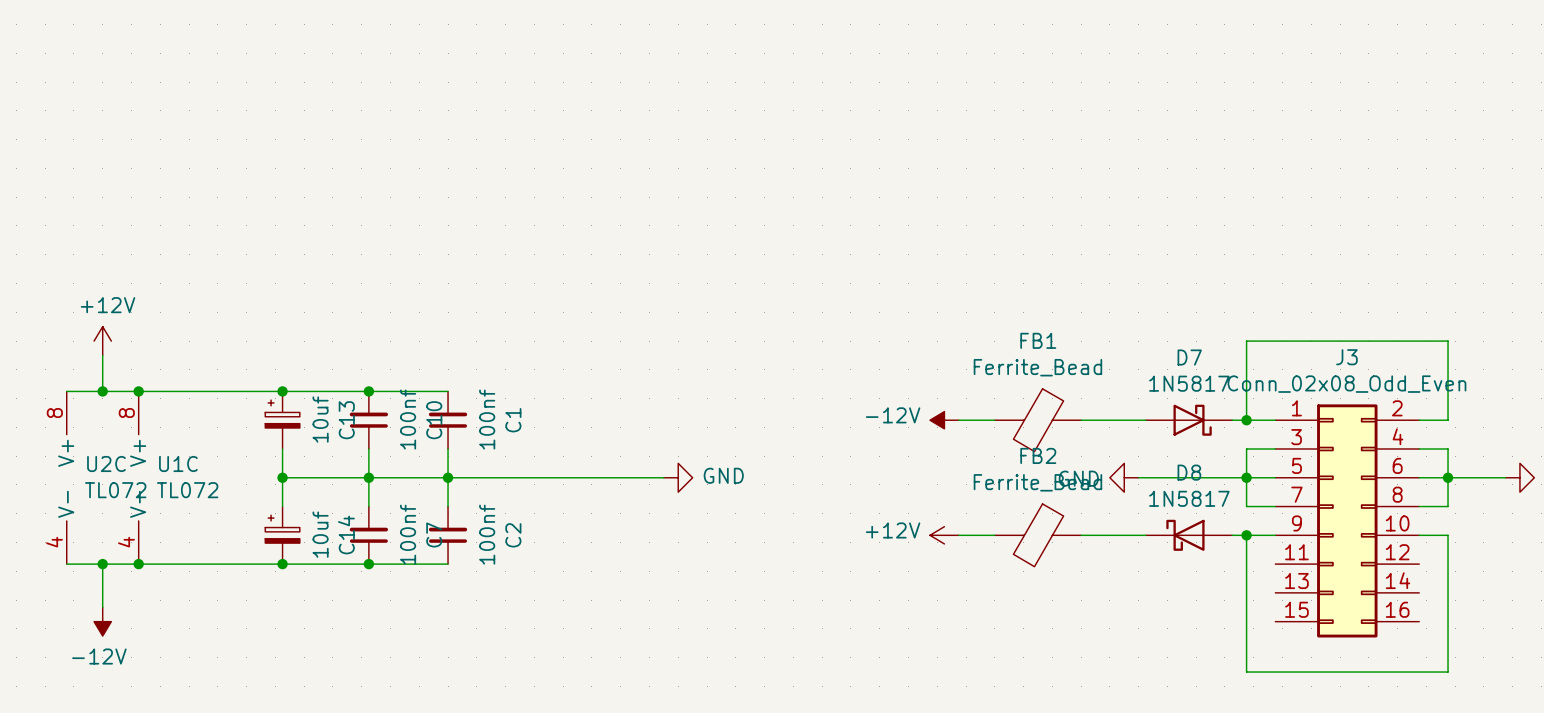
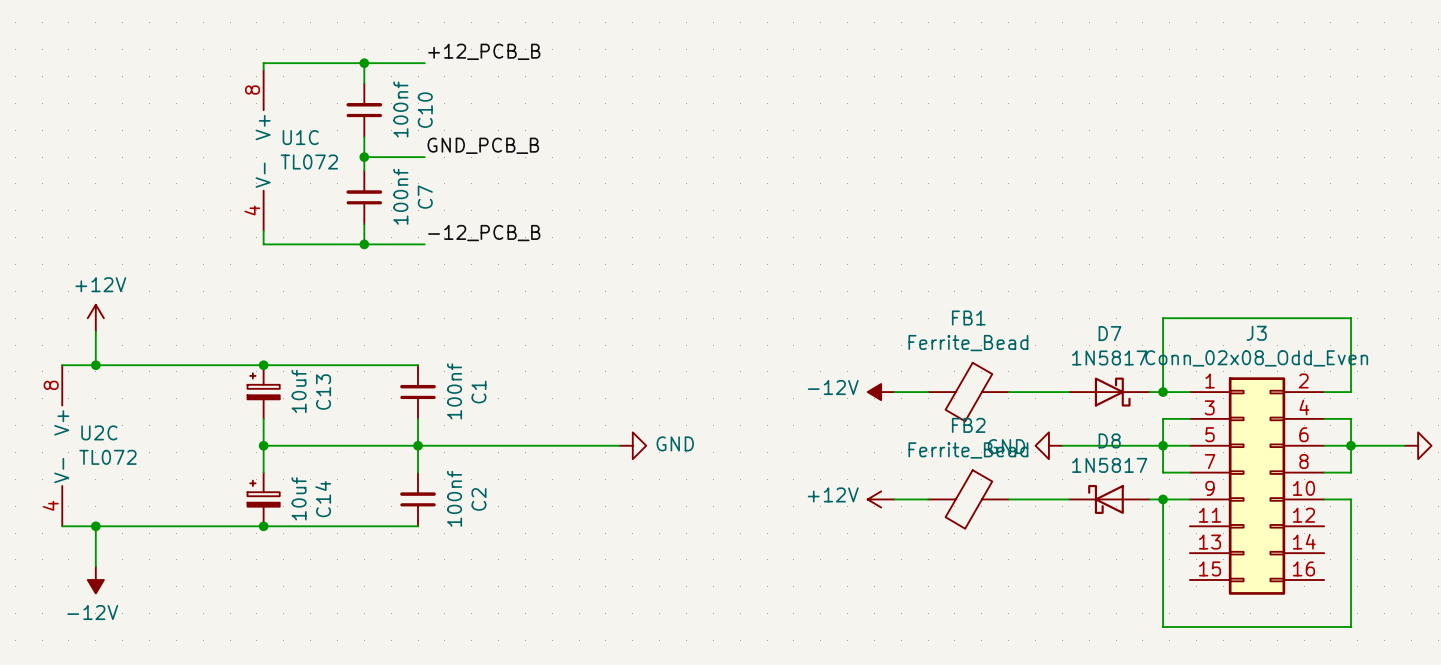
label: none -> +12_PCB_B (484, 51)
wire: none -> (364, 63) (364, 83)
junction: none -> (364, 63)
wire: none -> (424, 63) (263, 63) (263, 69)
wire: none -> (364, 137) (364, 170)
label: none -> GND_PCB_B (483, 145)
wire: none -> (364, 157) (424, 157)
junction: none -> (364, 157)
wire: none -> (364, 224) (364, 244)
wire: none -> (263, 230) (263, 244) (424, 244)
label: none -> -12_PCB_B (484, 233)
junction: none -> (364, 244)
junction: (138, 391) -> none
junction: (368, 391) -> none
C10 position: (368, 420) -> (364, 110)
wire: (368, 448) (368, 506) -> none
U1C position: (138, 477) -> (263, 150)
junction: (368, 477) -> none
C7 position: (368, 535) -> (364, 197)
junction: (138, 564) -> none
junction: (368, 564) -> none

